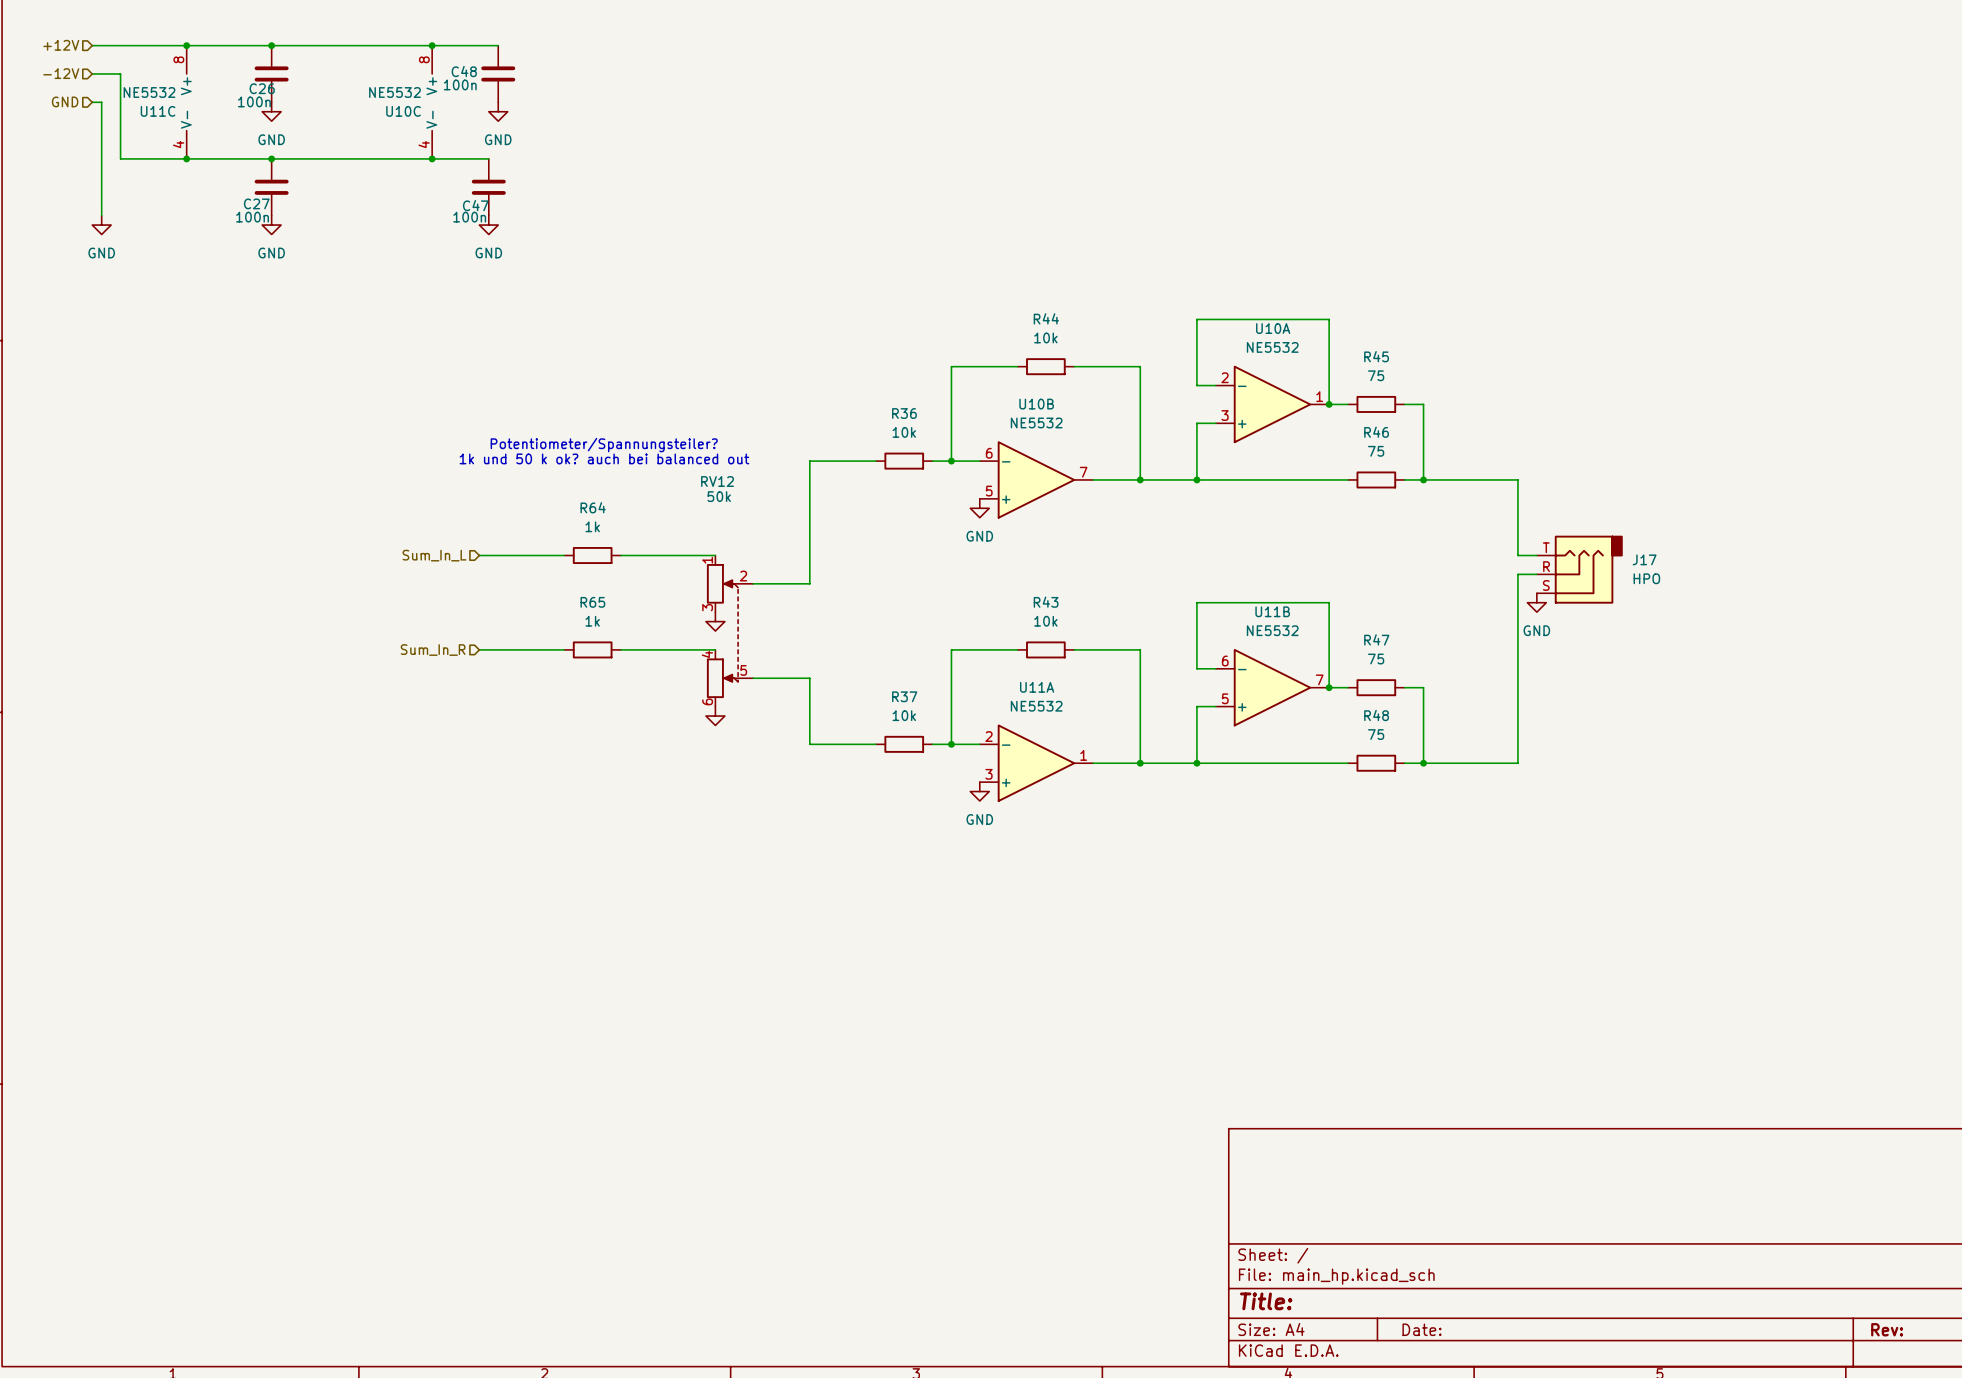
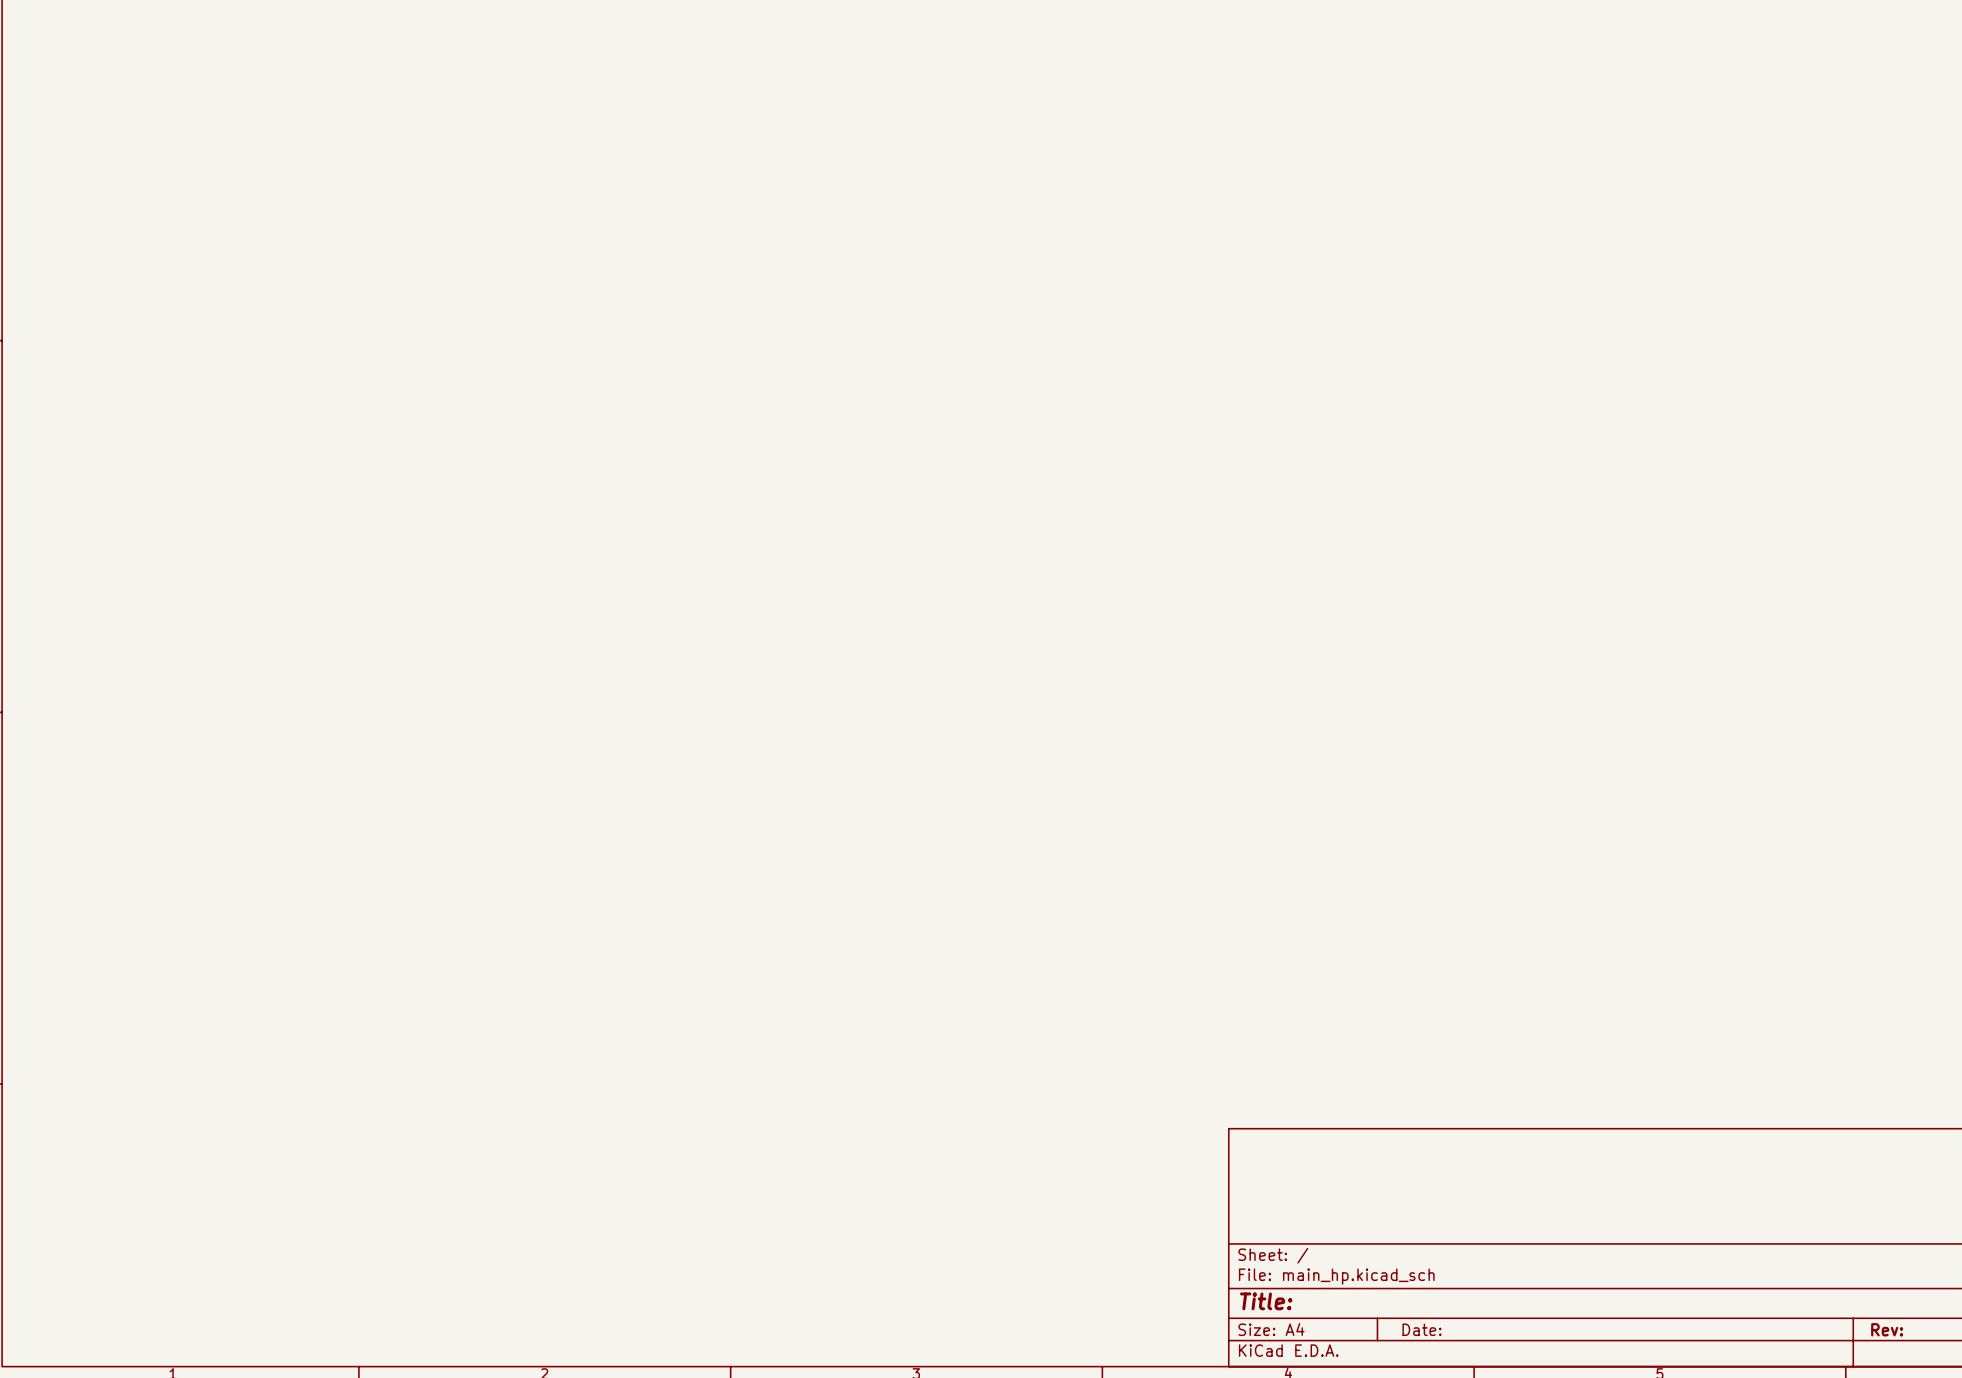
hierarchical label: +12V (61, 45) -> none
wire: (92, 45) (498, 45) -> none
junction: (186, 45) -> none
junction: (271, 45) -> none
junction: (432, 45) -> none
hierarchical label: -12V (61, 73) -> none
wire: (92, 73) (120, 73) (120, 158) (488, 158) -> none
C26: 100n (271, 73) -> none
C48: 100n (498, 73) -> none
hierarchical label: GND (65, 101) -> none
wire: (92, 102) (101, 102) (101, 215) -> none
U11C: NE5532 (186, 102) -> none
U10C: NE5532 (432, 102) -> none
power symbol: GND (271, 111) -> none
power symbol: GND (498, 111) -> none
junction: (186, 158) -> none
junction: (271, 158) -> none
junction: (432, 158) -> none
C27: 100n (271, 187) -> none
C47: 100n (488, 187) -> none
power symbol: GND (101, 225) -> none
power symbol: GND (271, 225) -> none
power symbol: GND (488, 225) -> none
wire: (1017, 366) (951, 366) (951, 461) -> none
R44: 10k (1045, 366) -> none
wire: (1074, 366) (1140, 366) (1140, 479) -> none
wire: (1215, 385) (1196, 385) (1196, 319) (1329, 319) (1329, 404) (1348, 404) -> none
U10A: NE5532 (1272, 404) -> none
junction: (1329, 404) -> none
R45: 75 (1376, 404) -> none
wire: (1404, 404) (1423, 404) (1423, 479) -> none
wire: (1215, 423) (1196, 423) (1196, 479) -> none
text: Potentiometer/Spannungsteiler? (604, 445) -> none
text: 1k und 50 k ok? auch bei balanced out (604, 458) -> none
wire: (875, 461) (809, 461) (809, 583) (753, 583) -> none
R36: 10k (904, 461) -> none
wire: (932, 461) (979, 461) -> none
junction: (951, 461) -> none
U10B: NE5532 (1036, 479) -> none
wire: (1093, 479) (1348, 479) -> none
junction: (1140, 479) -> none
junction: (1196, 479) -> none
R46: 75 (1376, 479) -> none
wire: (1404, 479) (1517, 479) (1517, 555) (1536, 555) -> none
junction: (1423, 479) -> none
power symbol: GND (979, 508) -> none
hierarchical label: Sum_In_L (434, 555) -> none
wire: (479, 555) (564, 555) -> none
R64: 1k (592, 555) -> none
wire: (620, 555) (715, 555) -> none
J17: HPO (1579, 569) -> none
wire: (1536, 574) (1517, 574) (1517, 763) (1404, 763) -> none
power symbol: GND (1536, 602) -> none
power symbol: (715, 621) -> none
RV12: 50k (730, 631) -> none
wire: (479, 649) (564, 649) -> none
R65: 1k (592, 649) -> none
wire: (620, 649) (715, 649) -> none
wire: (1017, 649) (951, 649) (951, 744) -> none
R43: 10k (1045, 649) -> none
wire: (1074, 649) (1140, 649) (1140, 763) -> none
hierarchical label: Sum_In_R (433, 650) -> none
wire: (1215, 668) (1196, 668) (1196, 602) (1329, 602) (1329, 687) (1348, 687) -> none
wire: (753, 678) (809, 678) (809, 744) (875, 744) -> none
U11B: NE5532 (1272, 687) -> none
junction: (1329, 687) -> none
R47: 75 (1376, 687) -> none
wire: (1404, 687) (1423, 687) (1423, 763) -> none
wire: (1215, 706) (1196, 706) (1196, 763) -> none
power symbol: (715, 716) -> none
R37: 10k (904, 744) -> none
wire: (932, 744) (979, 744) -> none
junction: (951, 744) -> none
U11A: NE5532 (1036, 763) -> none
wire: (1093, 763) (1348, 763) -> none
junction: (1140, 763) -> none
junction: (1196, 763) -> none
R48: 75 (1376, 763) -> none
junction: (1423, 763) -> none
power symbol: GND (979, 791) -> none

